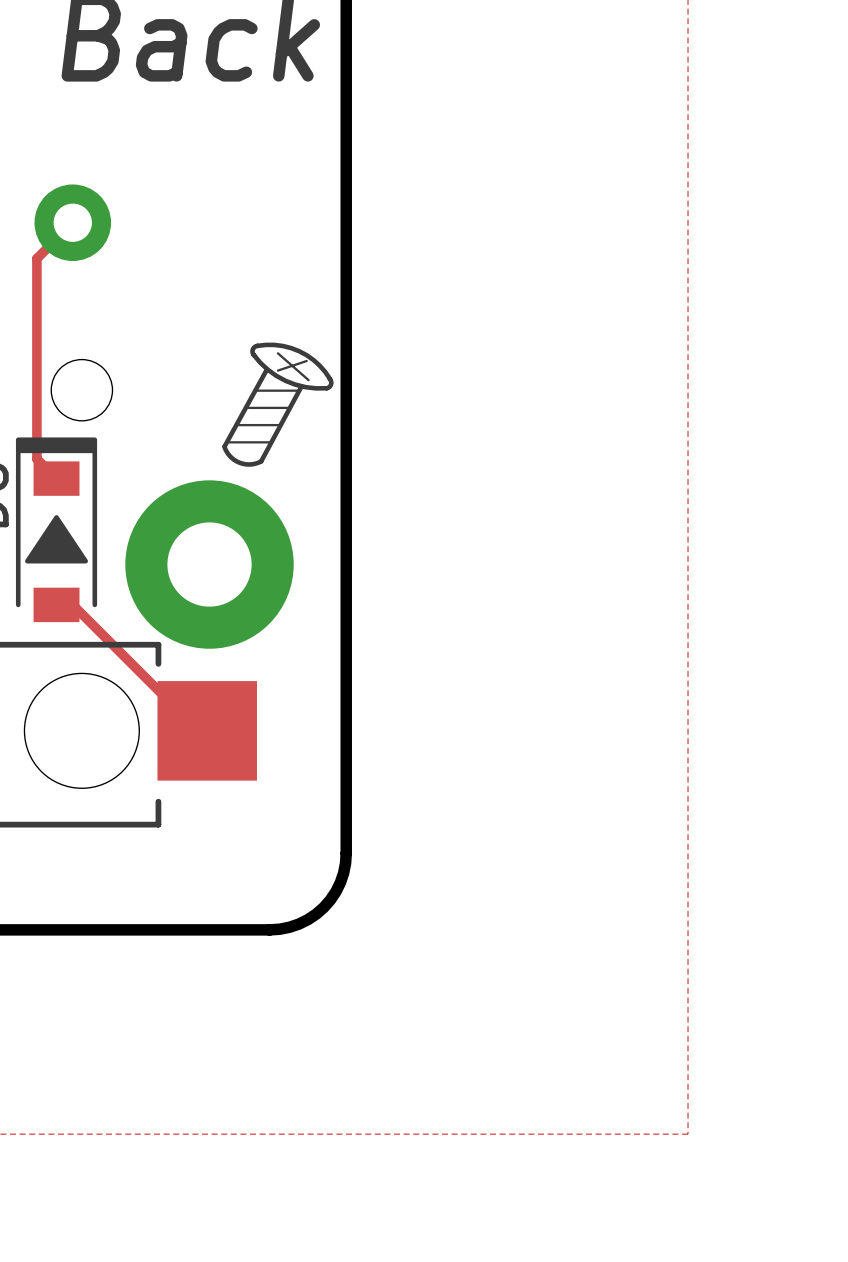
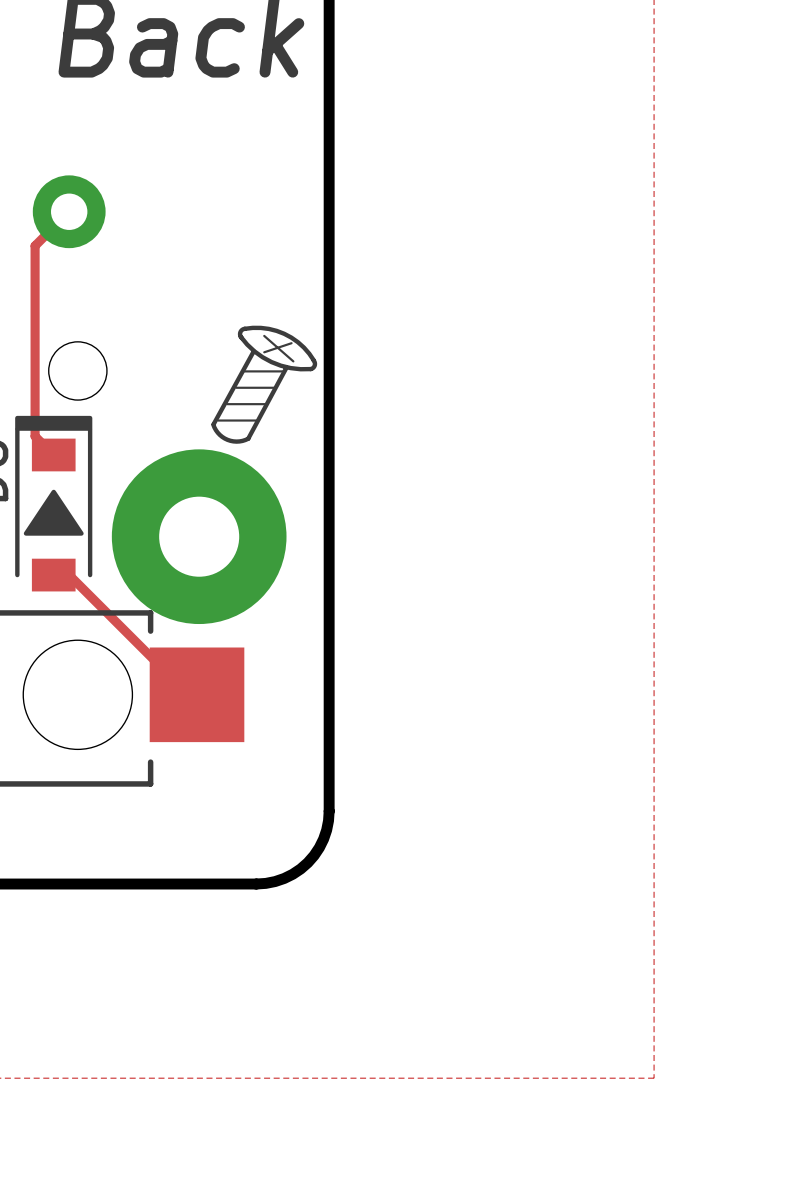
part footprint: [125, 480, 294, 649] -> [111, 449, 287, 625]

